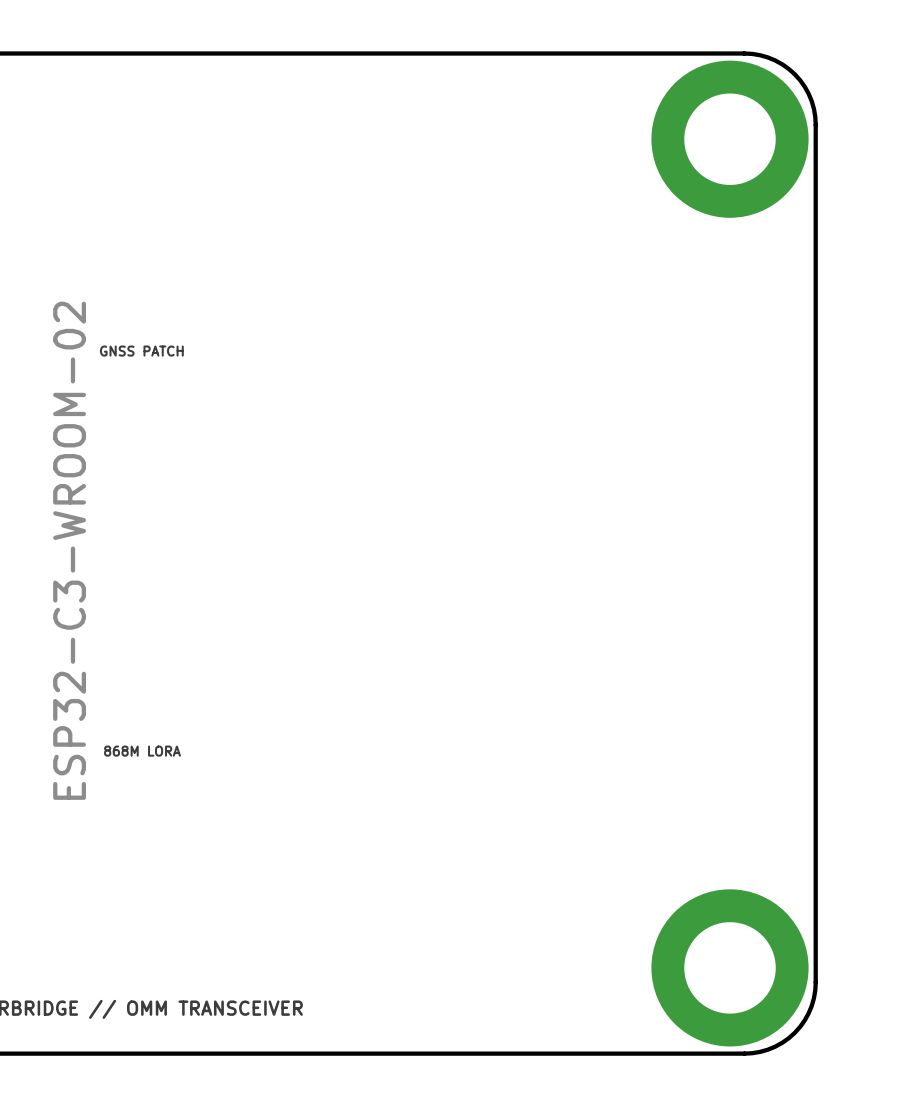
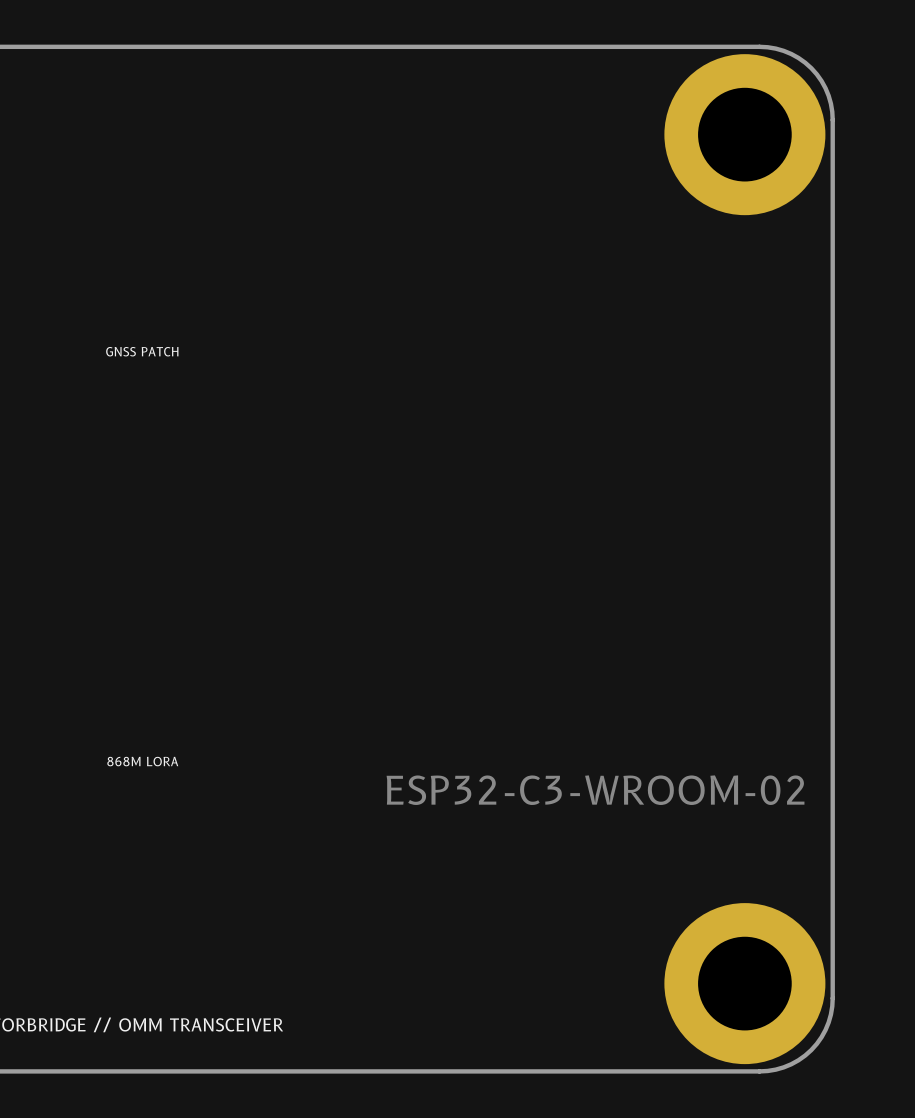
drawing position: (69, 550) -> (595, 790)

